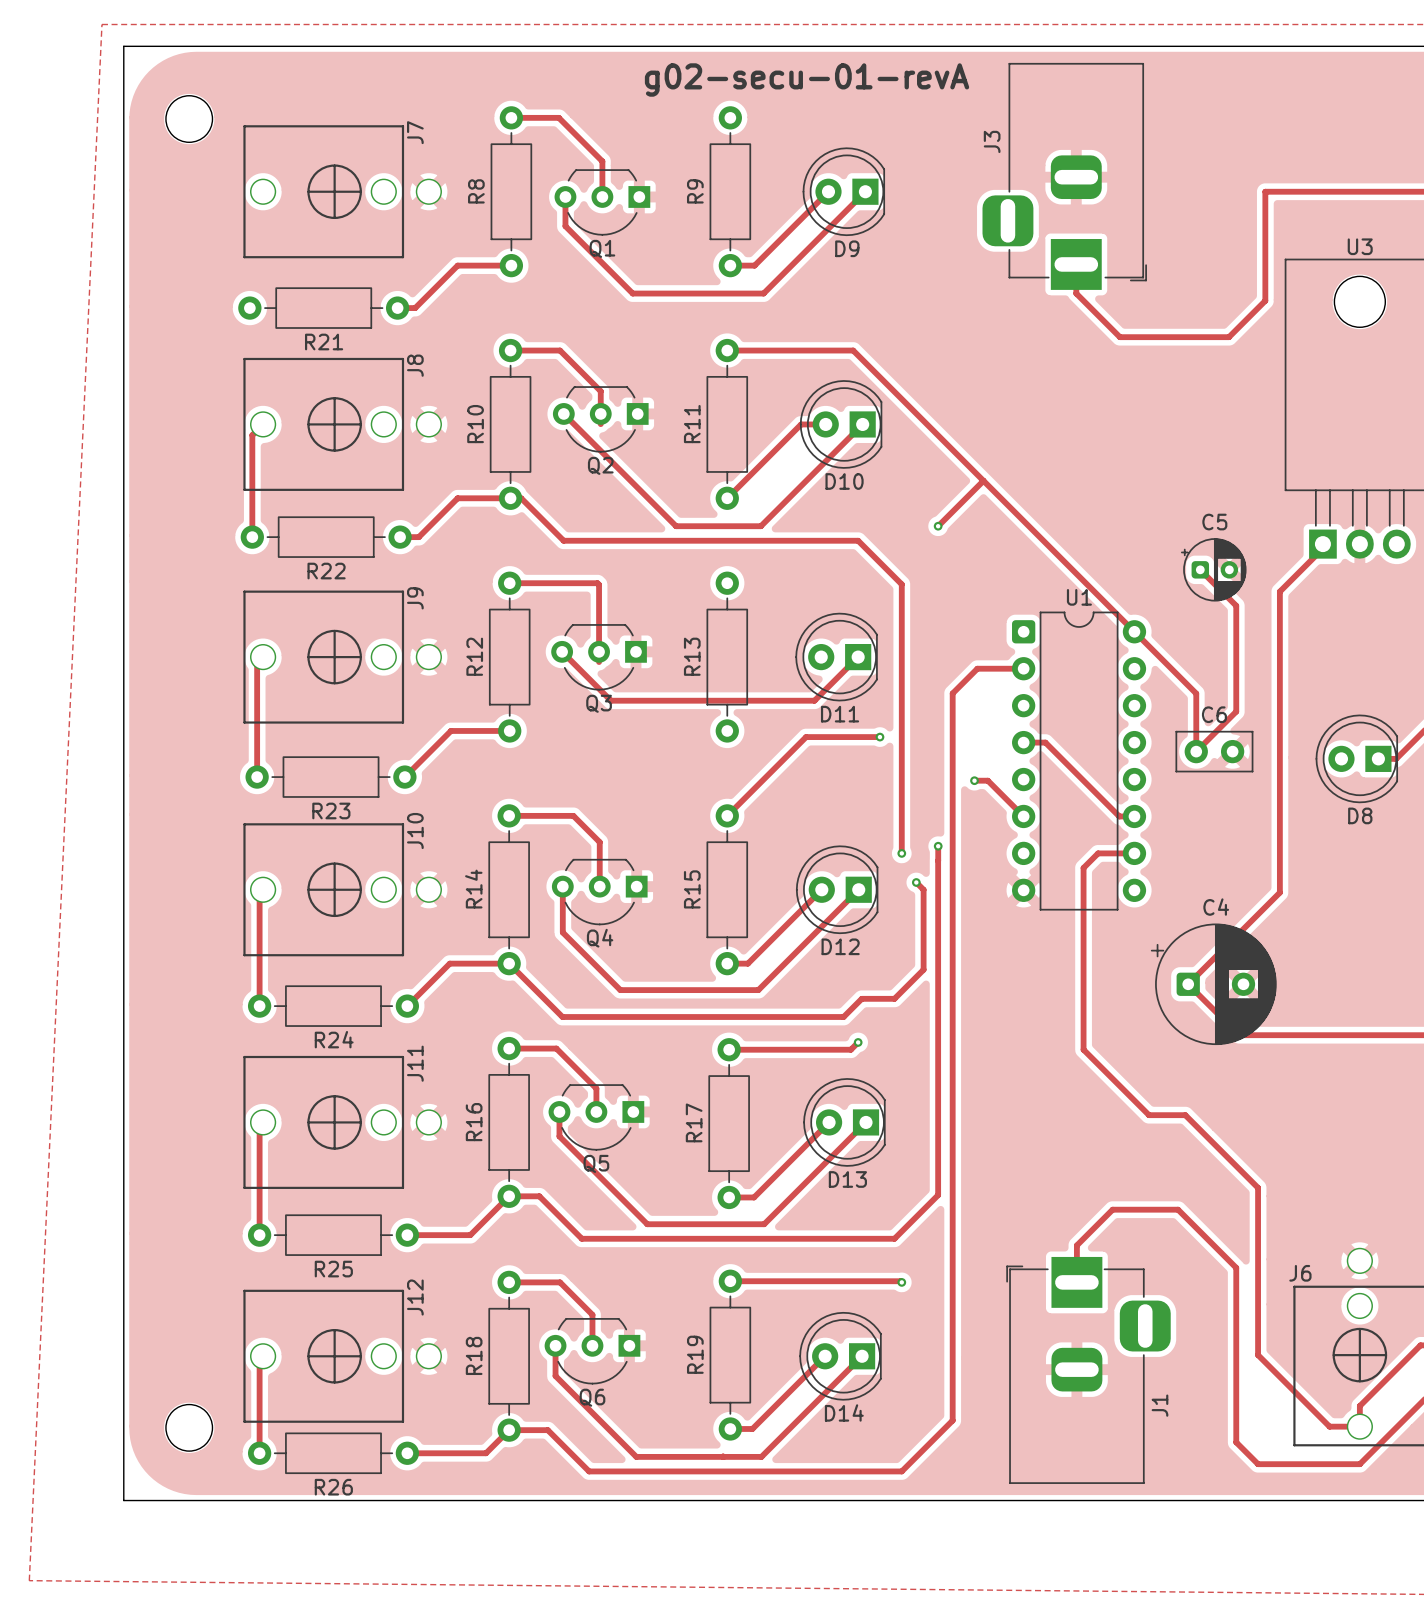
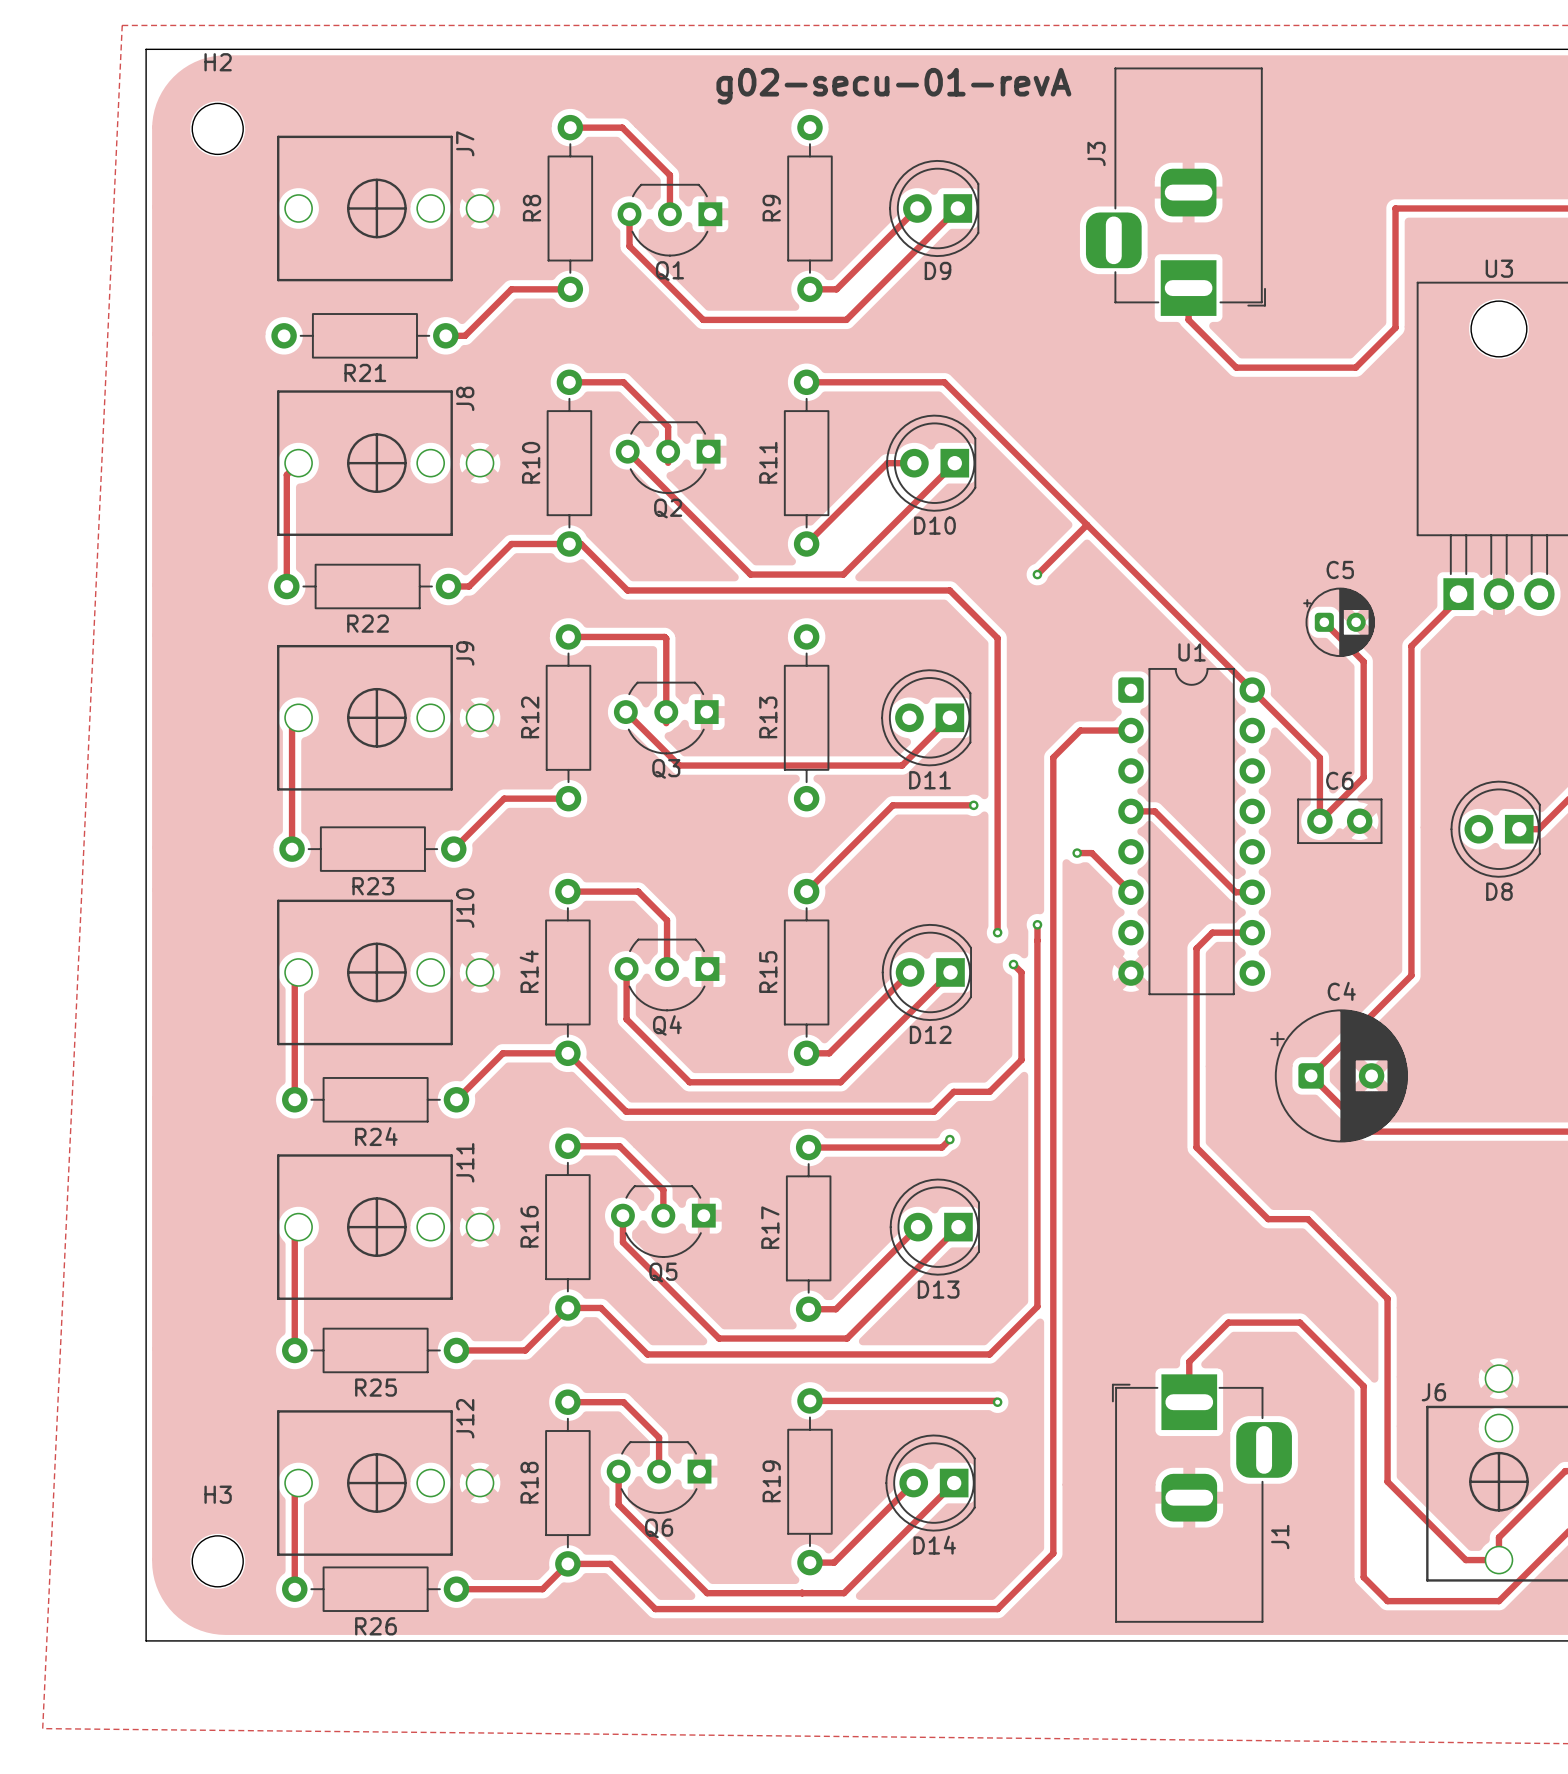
H2 name: none -> H2 (218, 62)
H3 name: none -> H3 (218, 1494)

